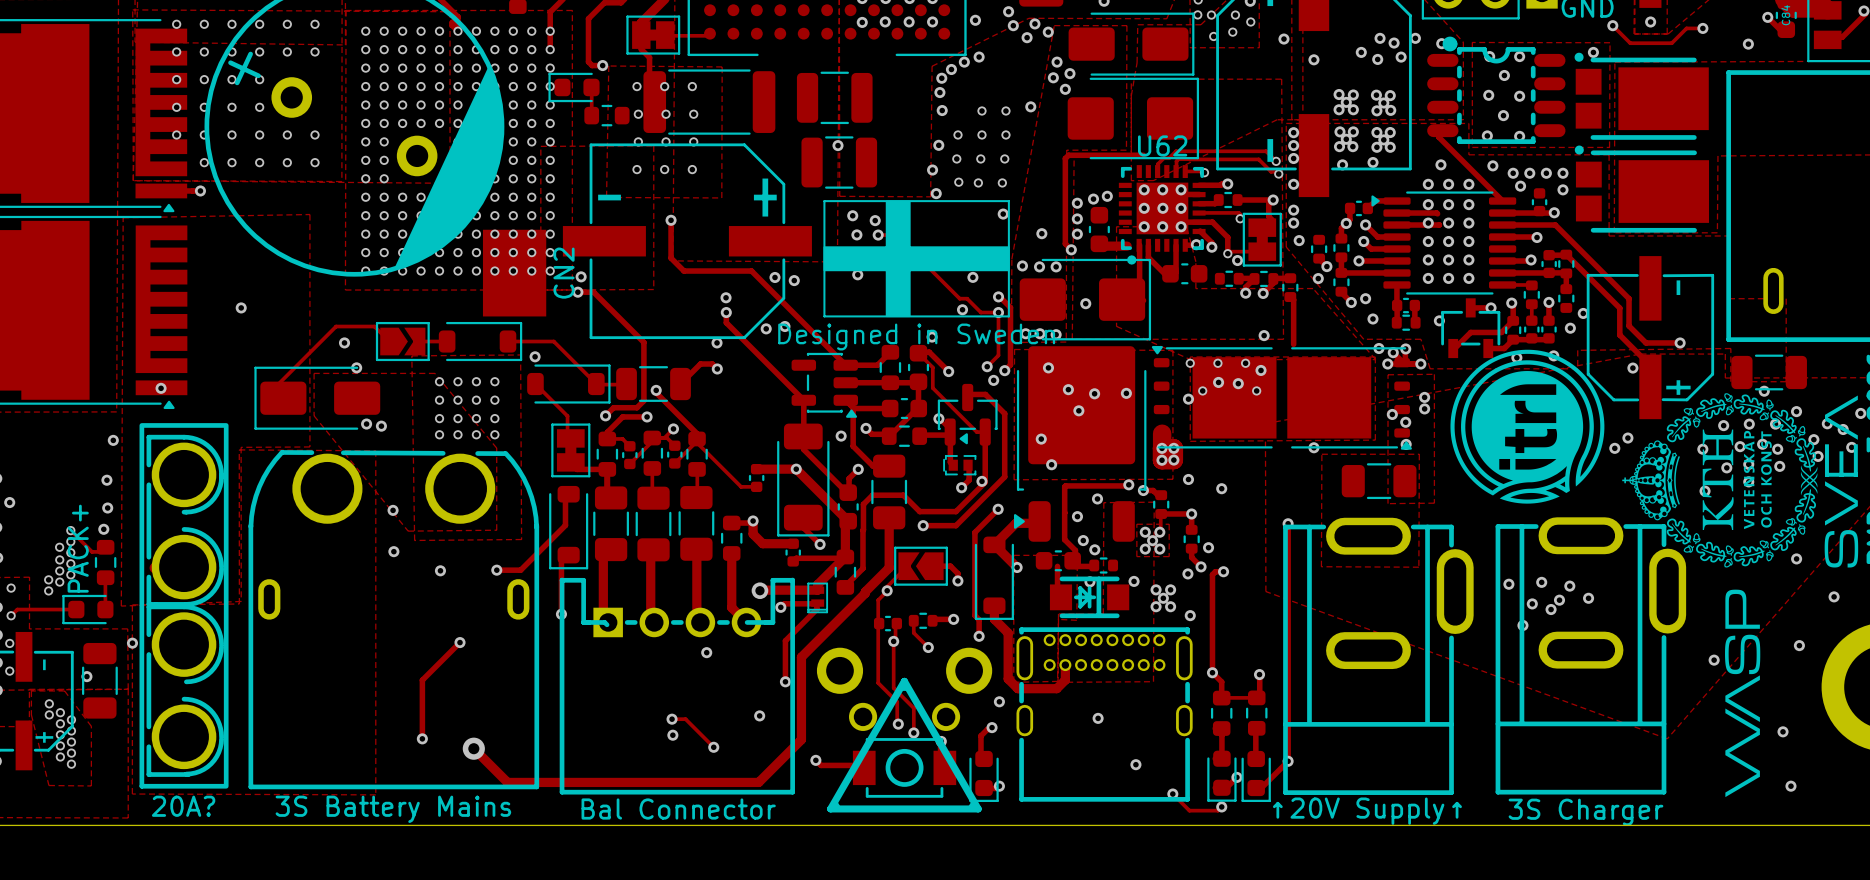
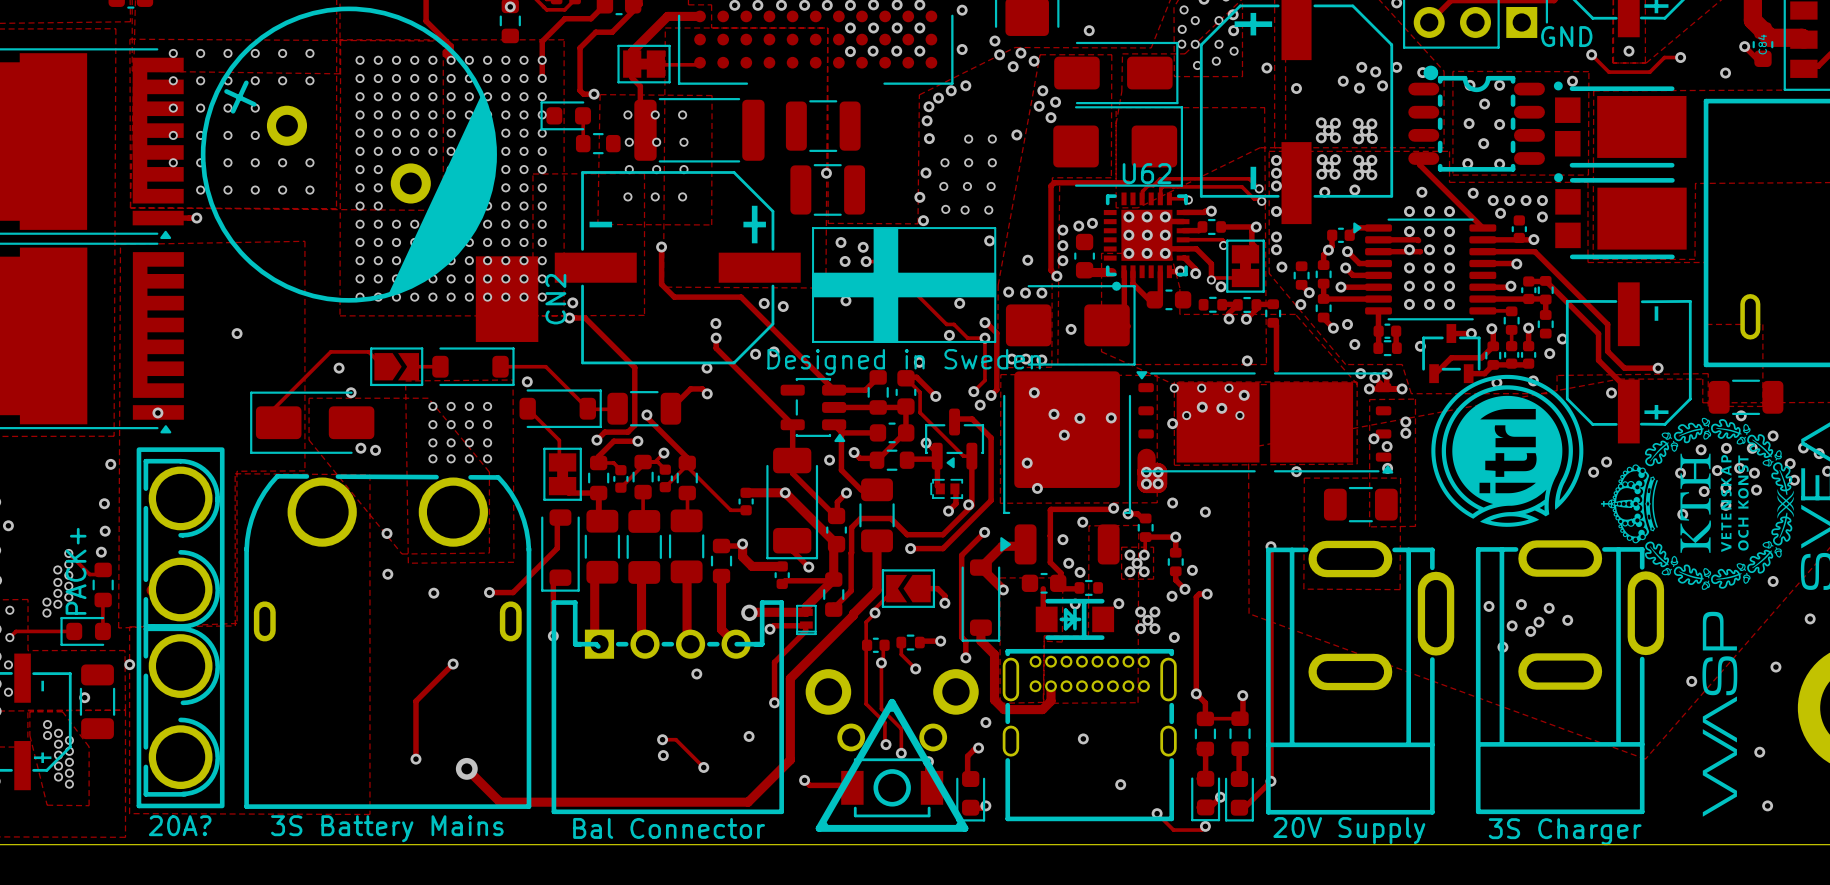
part text: ↑20V Supply↑ (1367, 811) -> 20V Supply (1349, 830)

